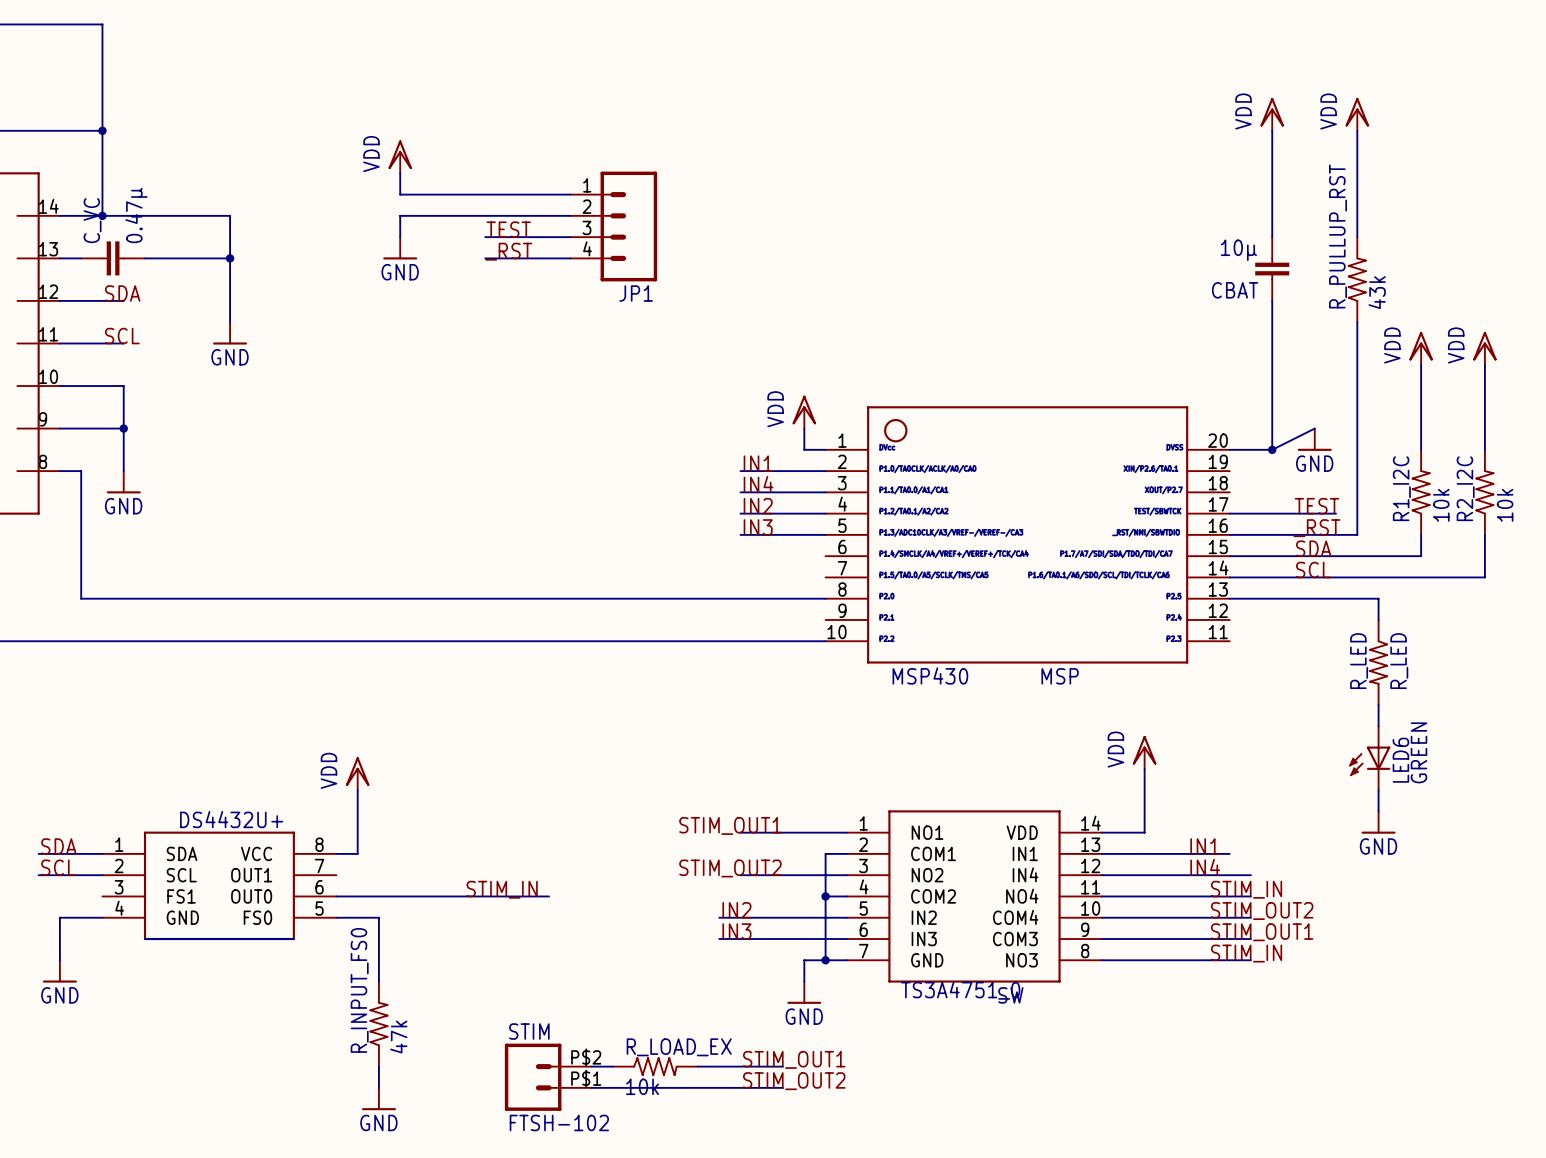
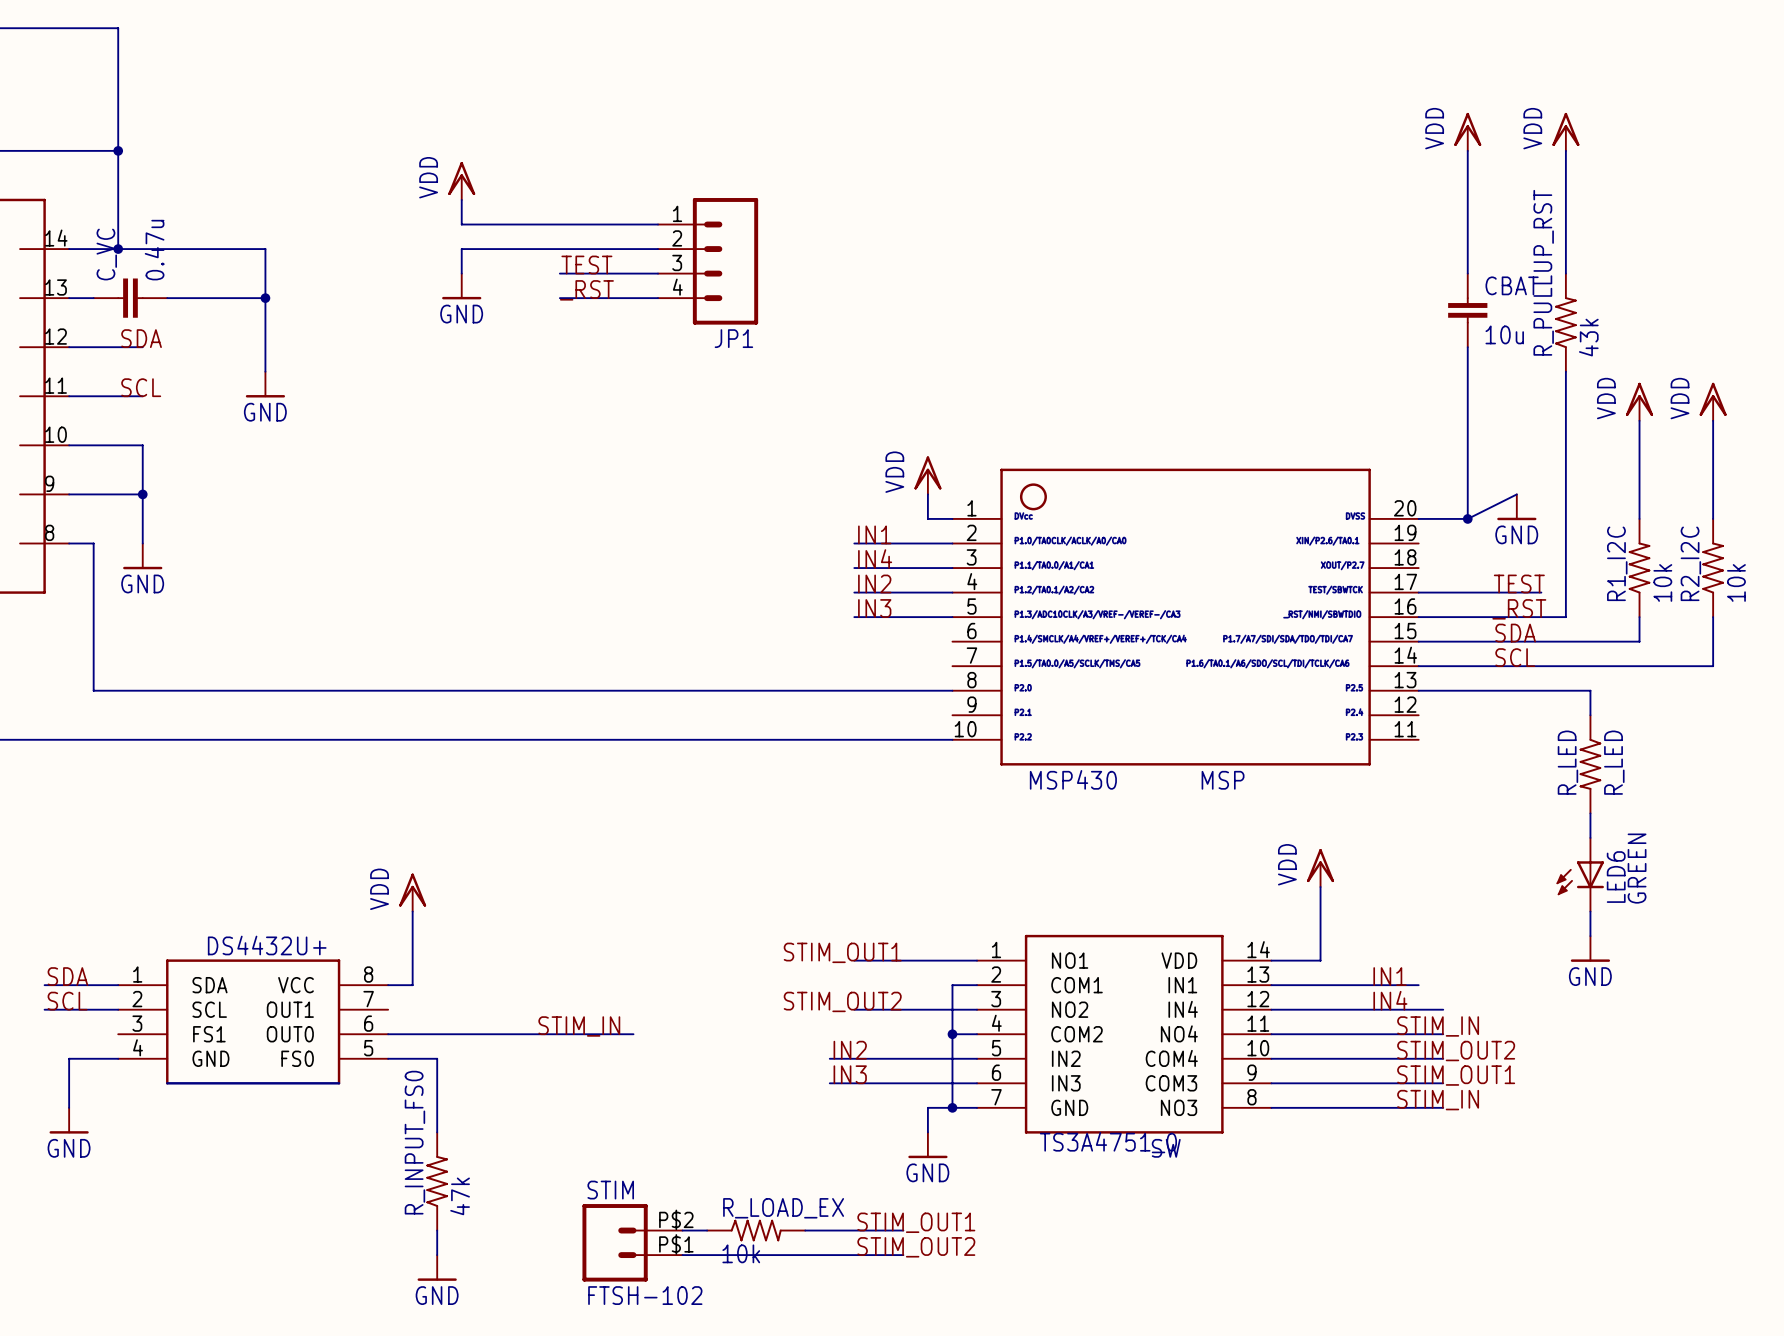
C_VC value: 0.47µ (136, 215) -> 0.47u (154, 250)
CBAT value: 10µ (1238, 250) -> 10u (1504, 334)
CBAT name position: CBAT (1235, 290) -> CBAT (1512, 285)

